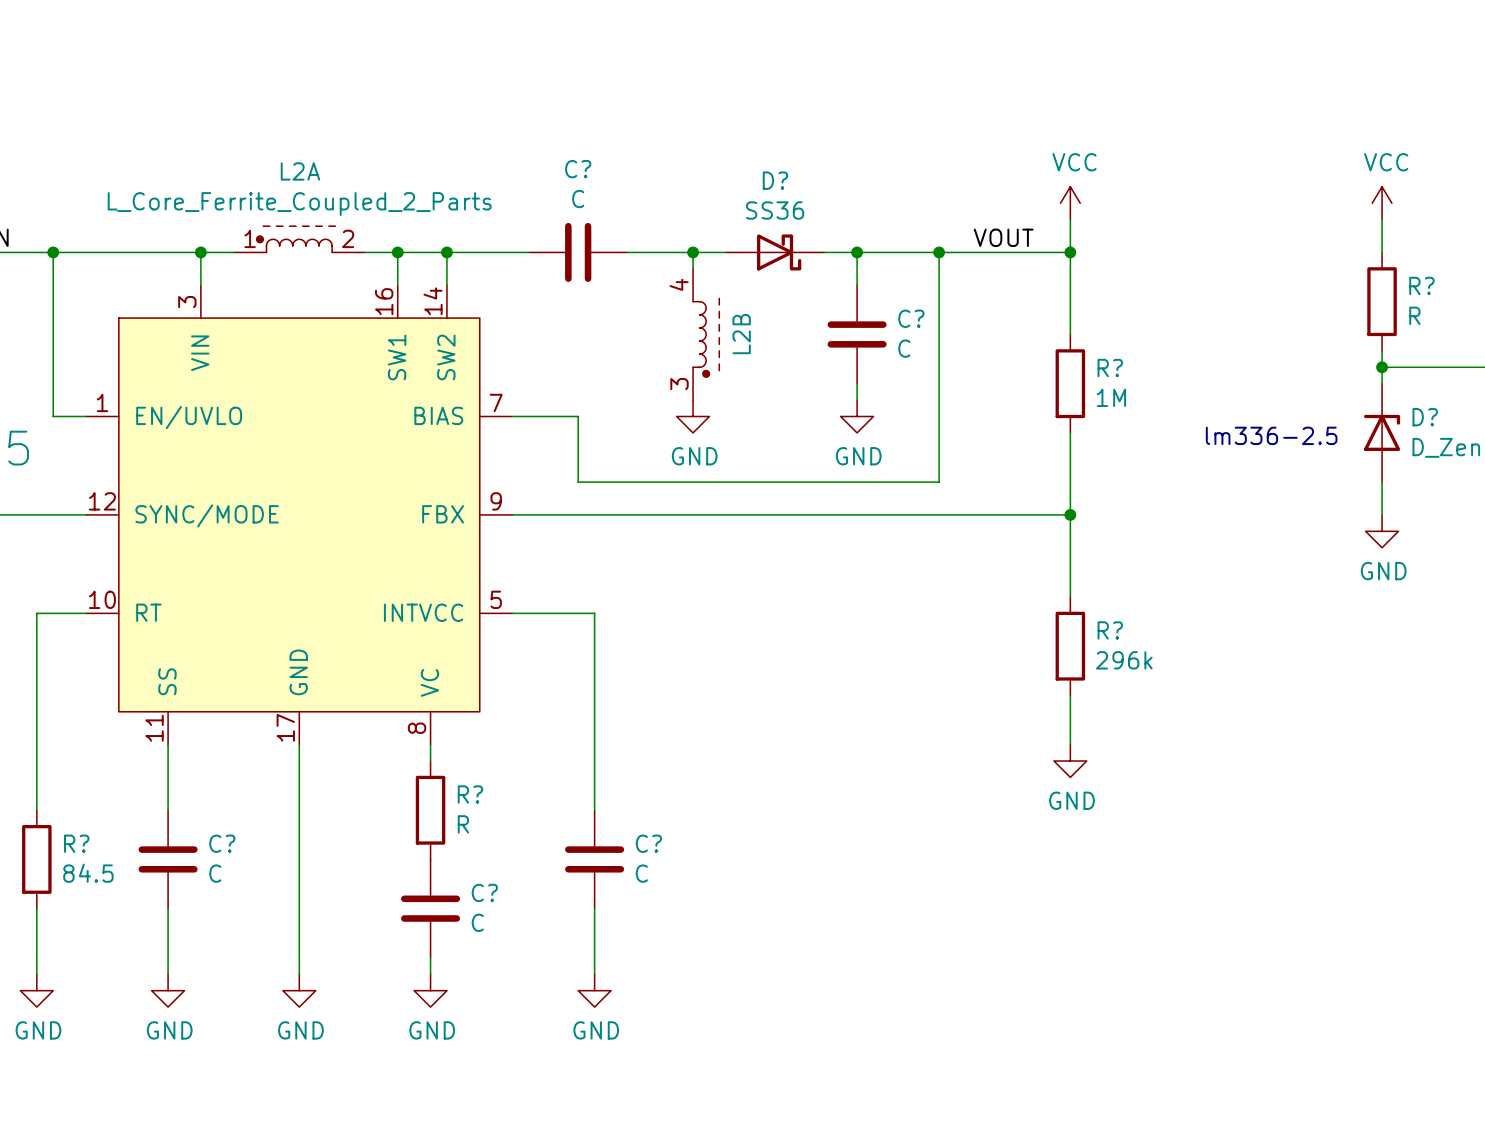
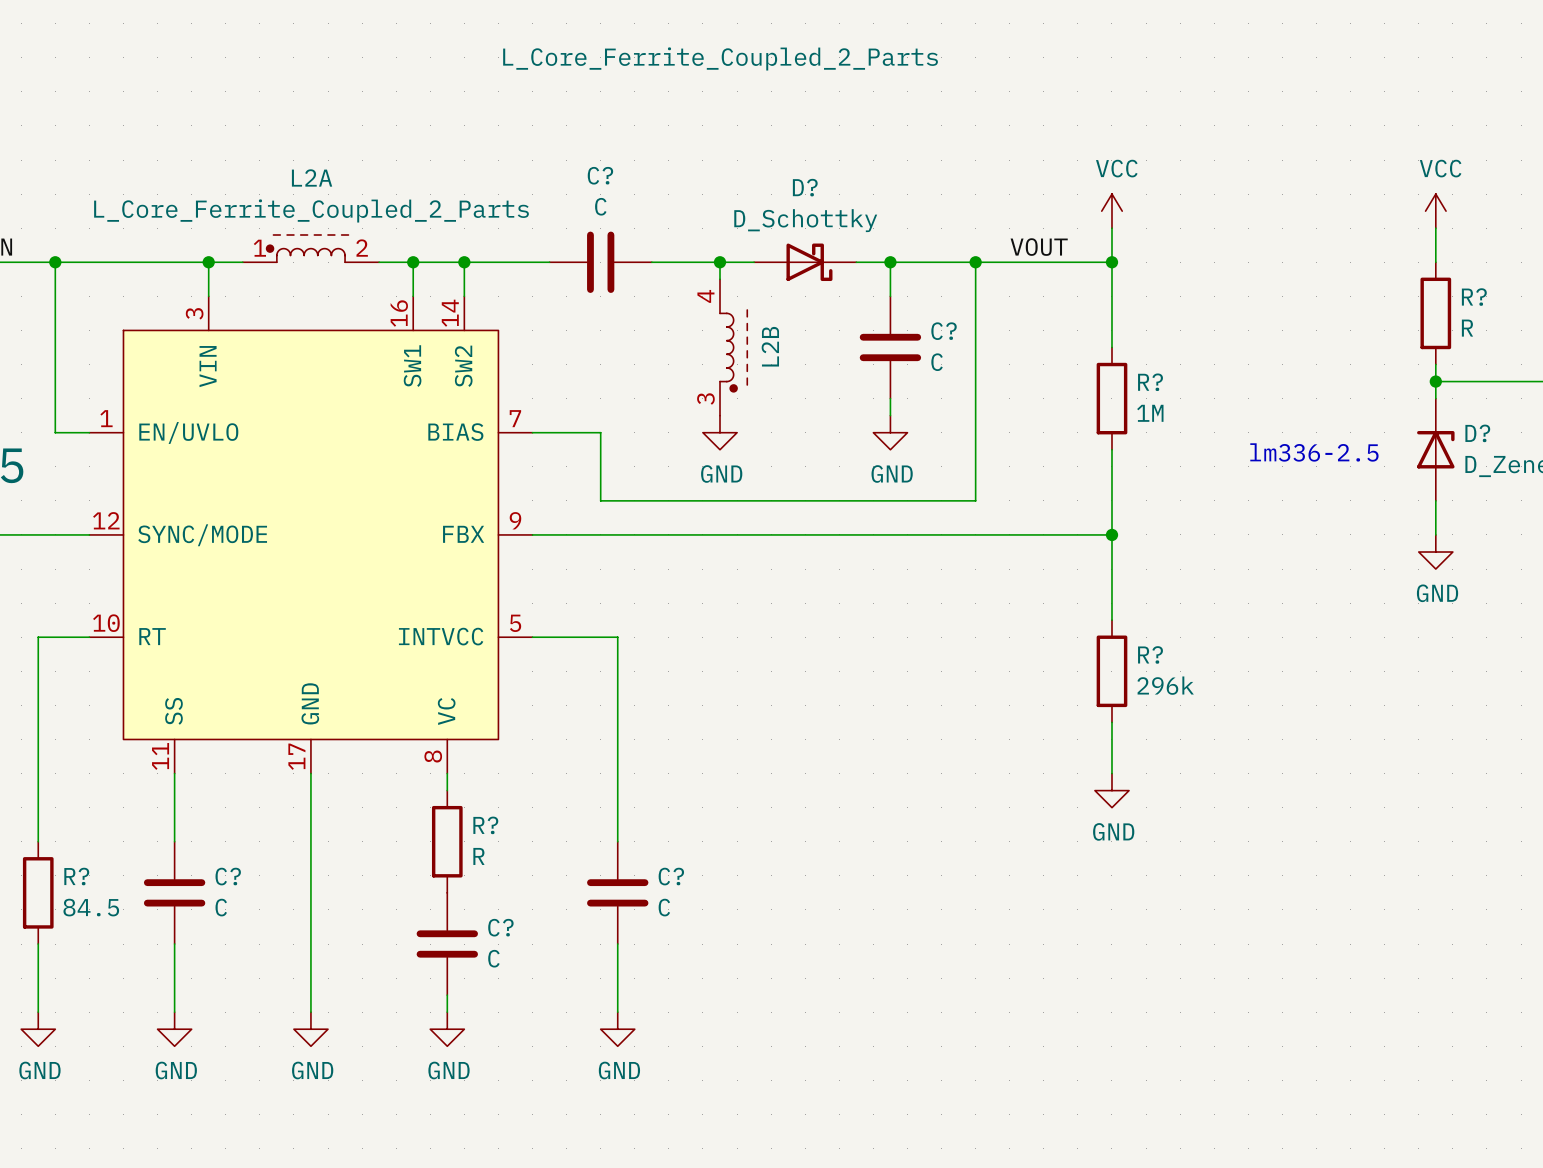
L2B value: none -> L_Core_Ferrite_Coupled_2_Parts (720, 58)
D? value: SS36 (775, 210) -> D_Schottky (805, 220)

